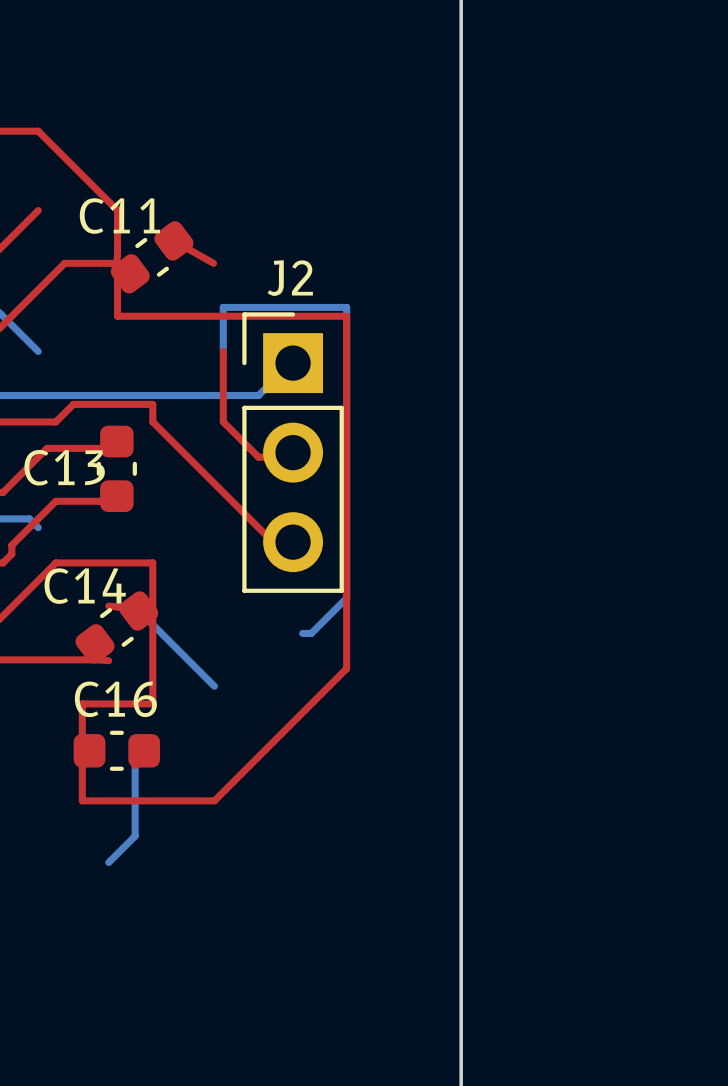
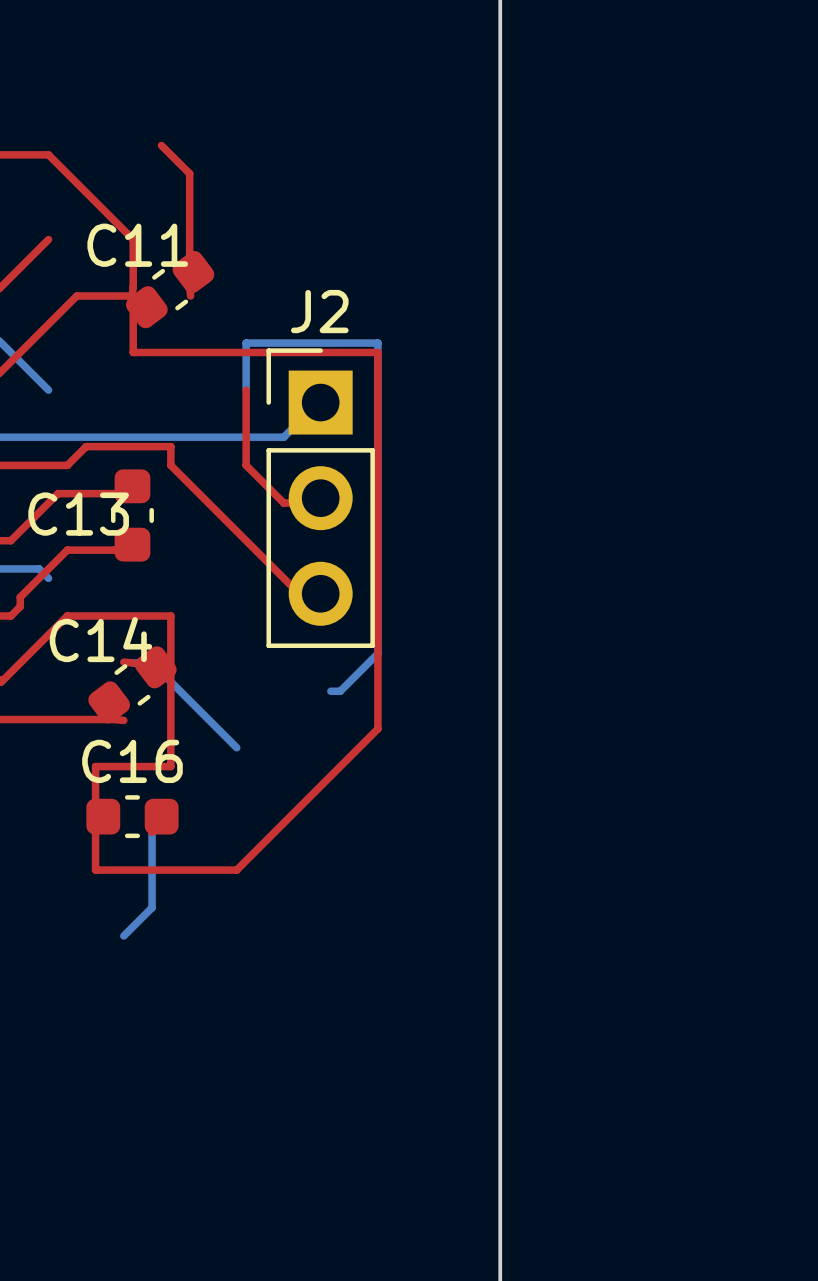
top track: none -> (161, 145) (189, 173) (190, 296)
top track: (173, 240) (213, 263) -> none

